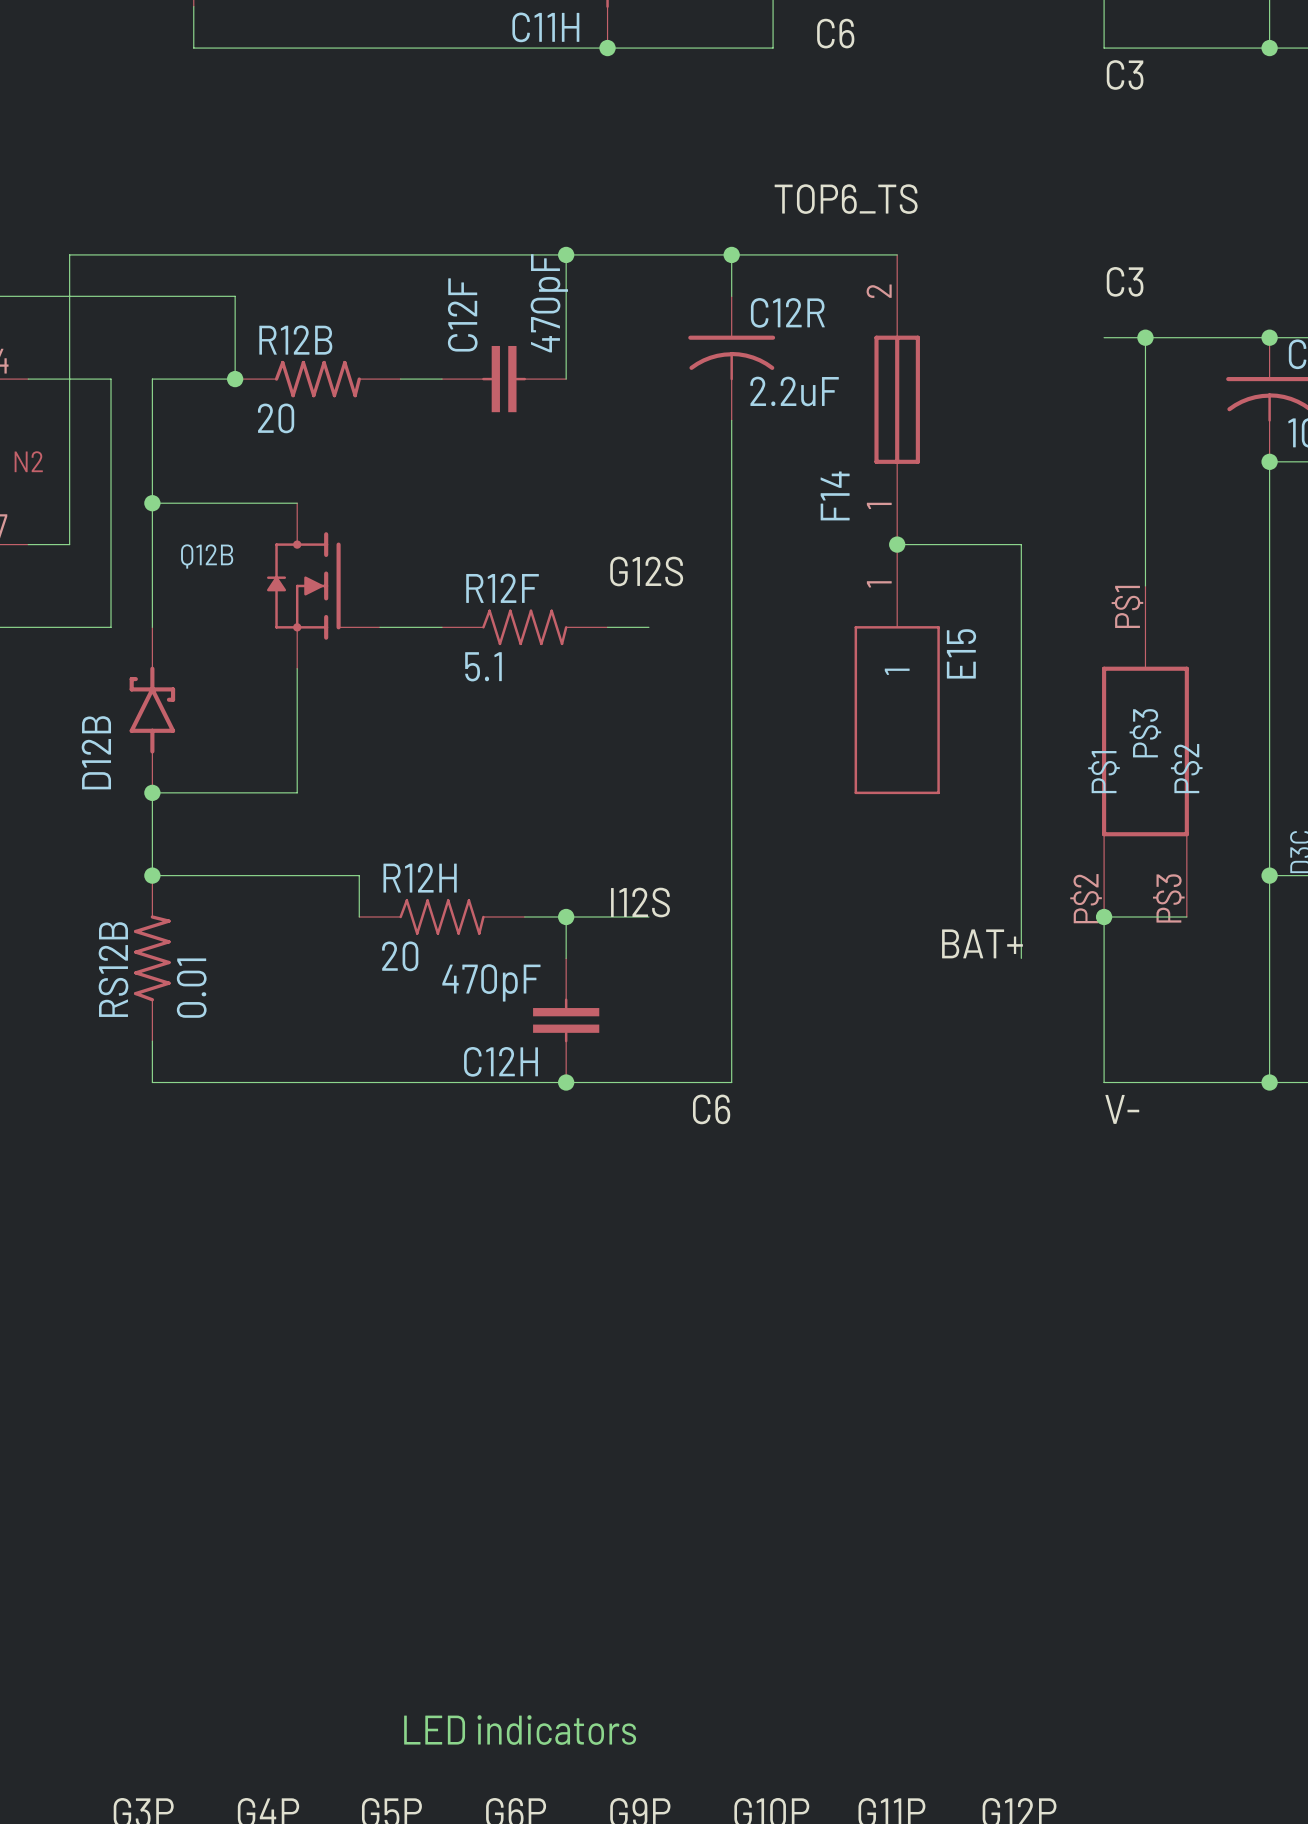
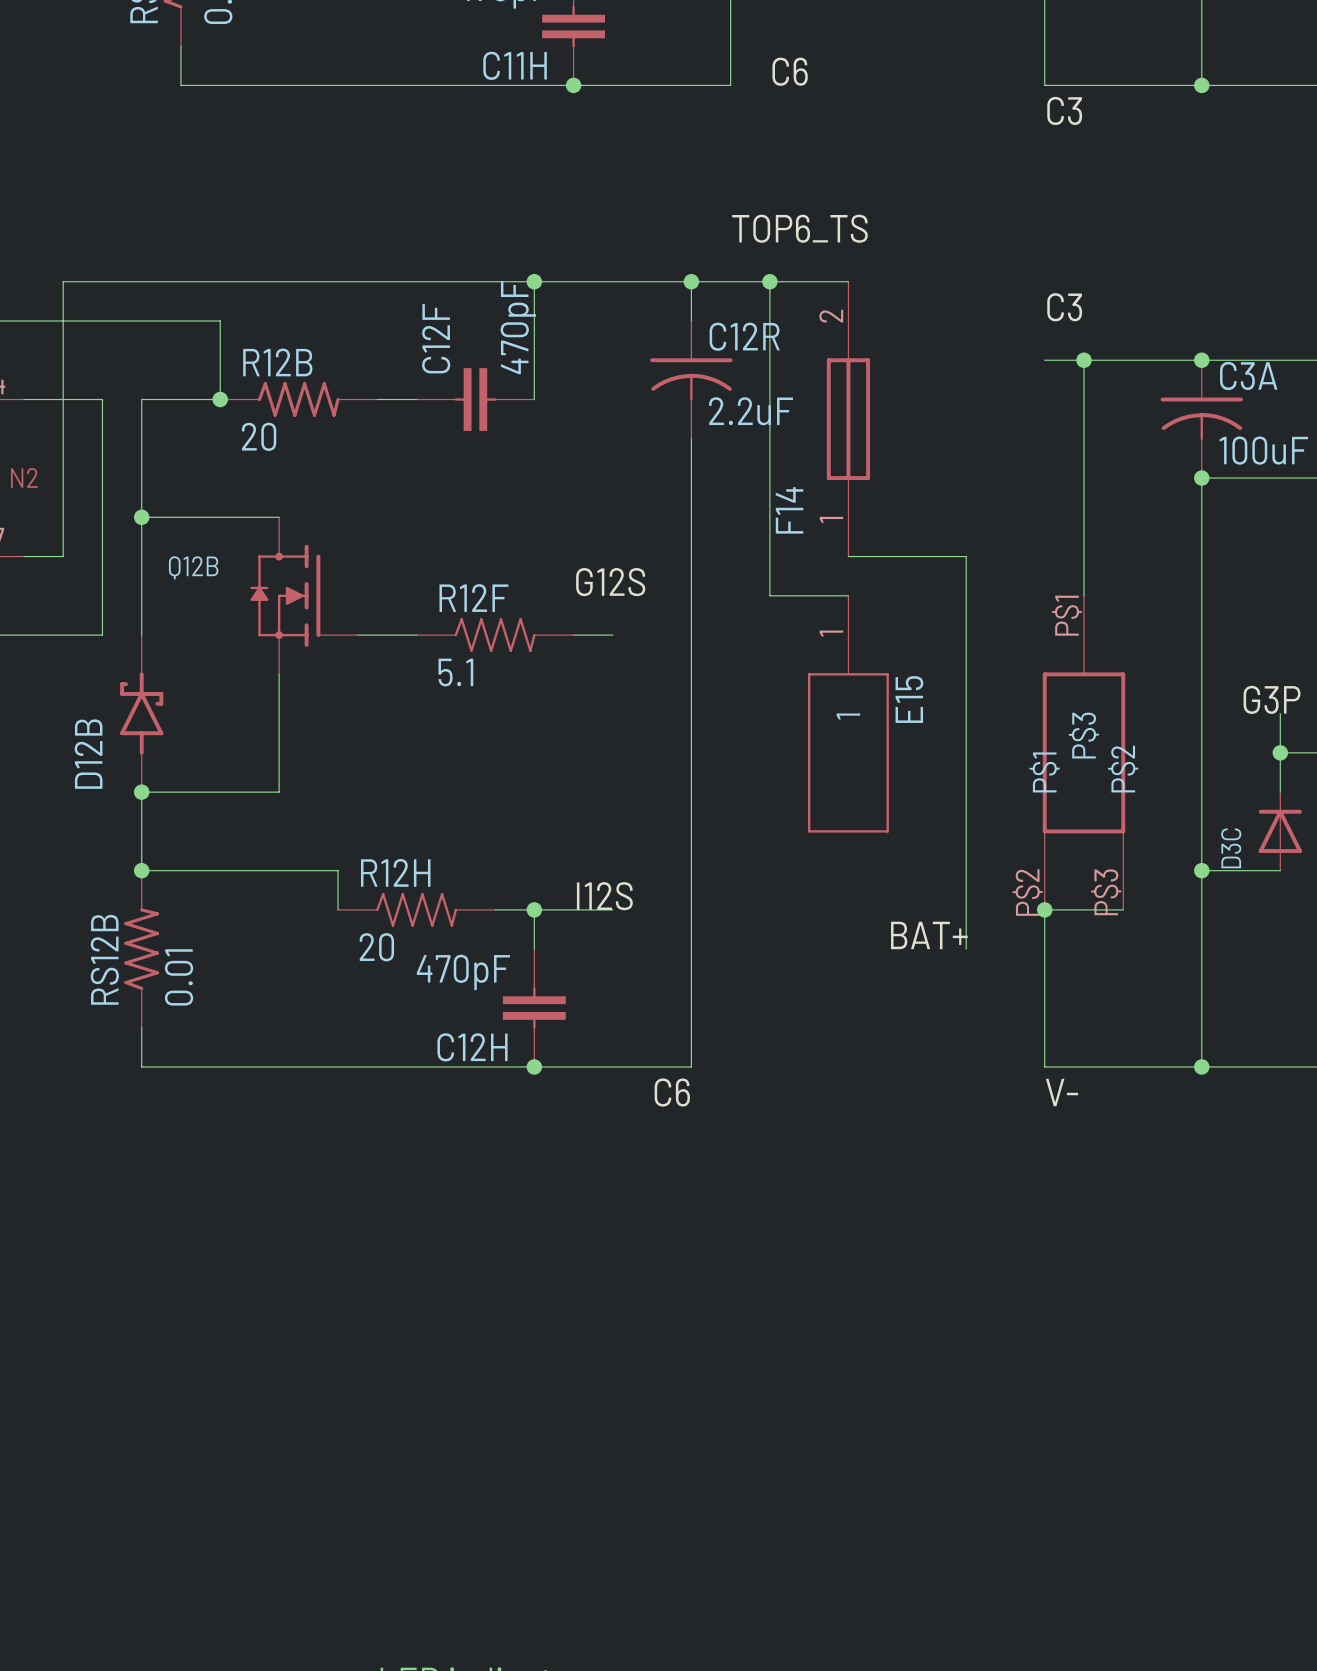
wire: none -> (769, 281) (769, 595) (848, 595)
junction: none -> (769, 281)
junction: (897, 544) -> none
E15 position: (897, 669) -> (848, 714)

